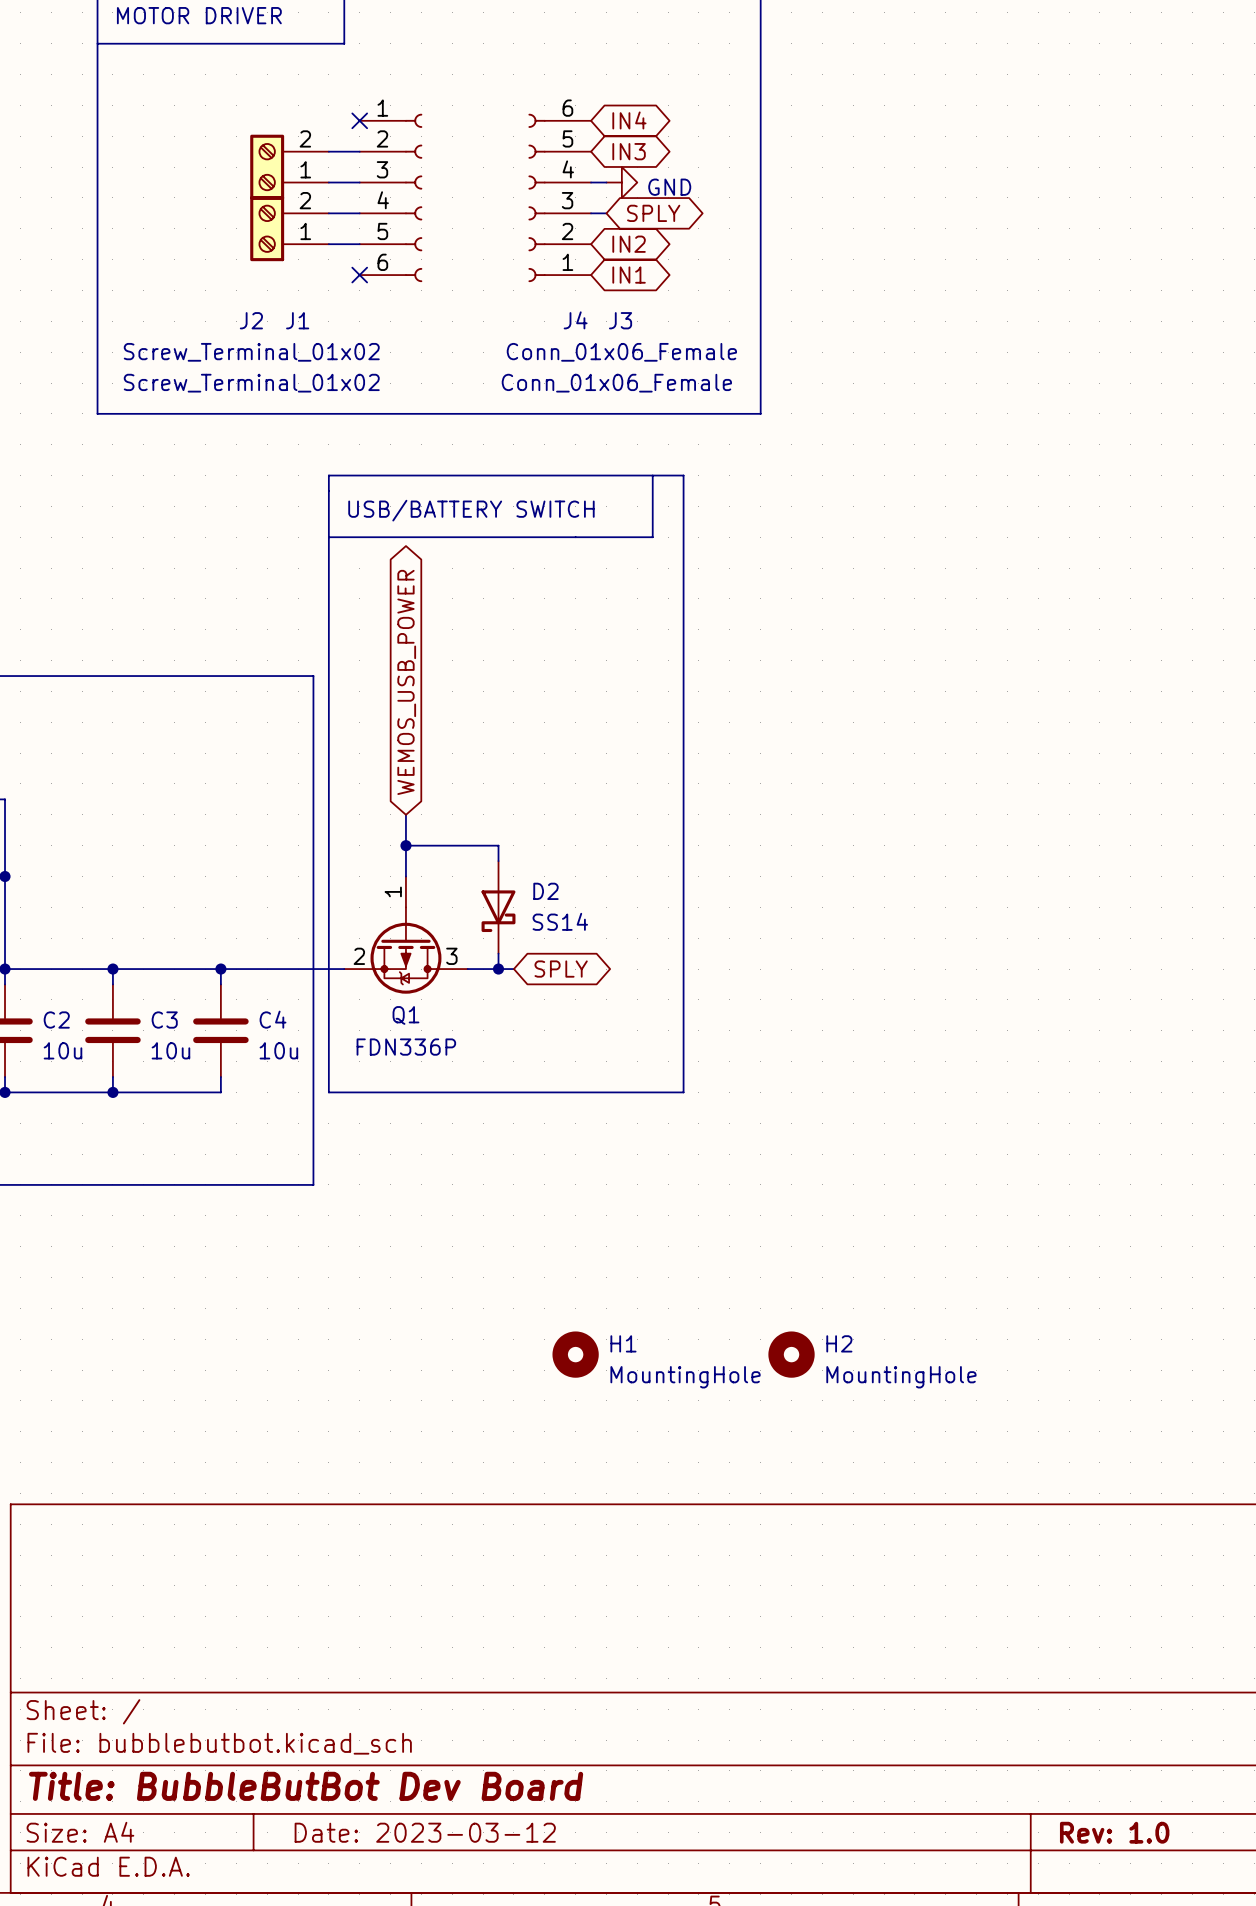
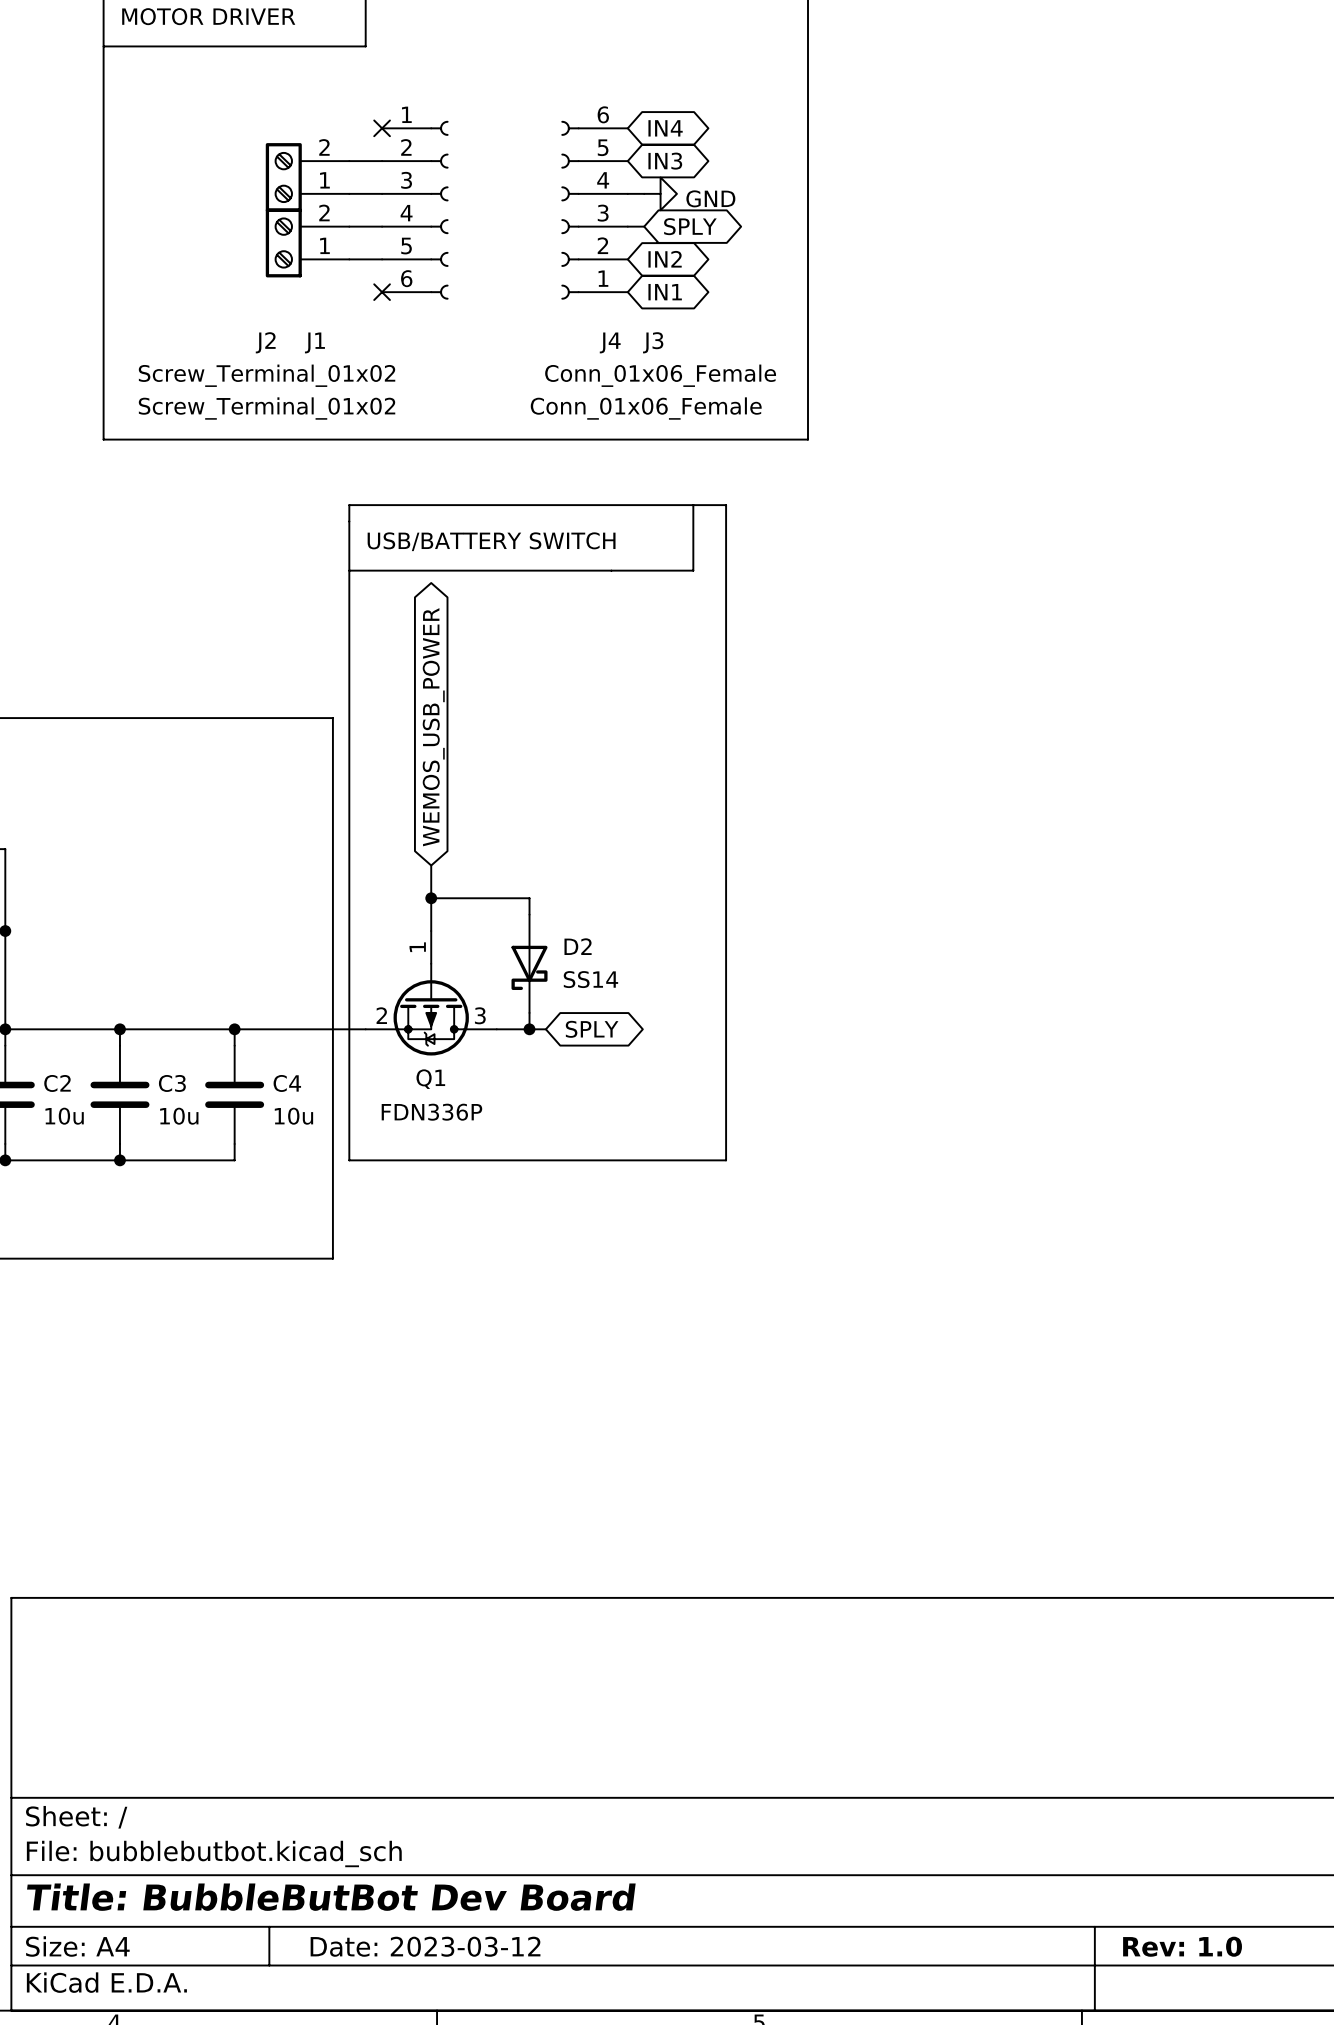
H1: MountingHole (575, 1354) -> none
H2: MountingHole (791, 1354) -> none

